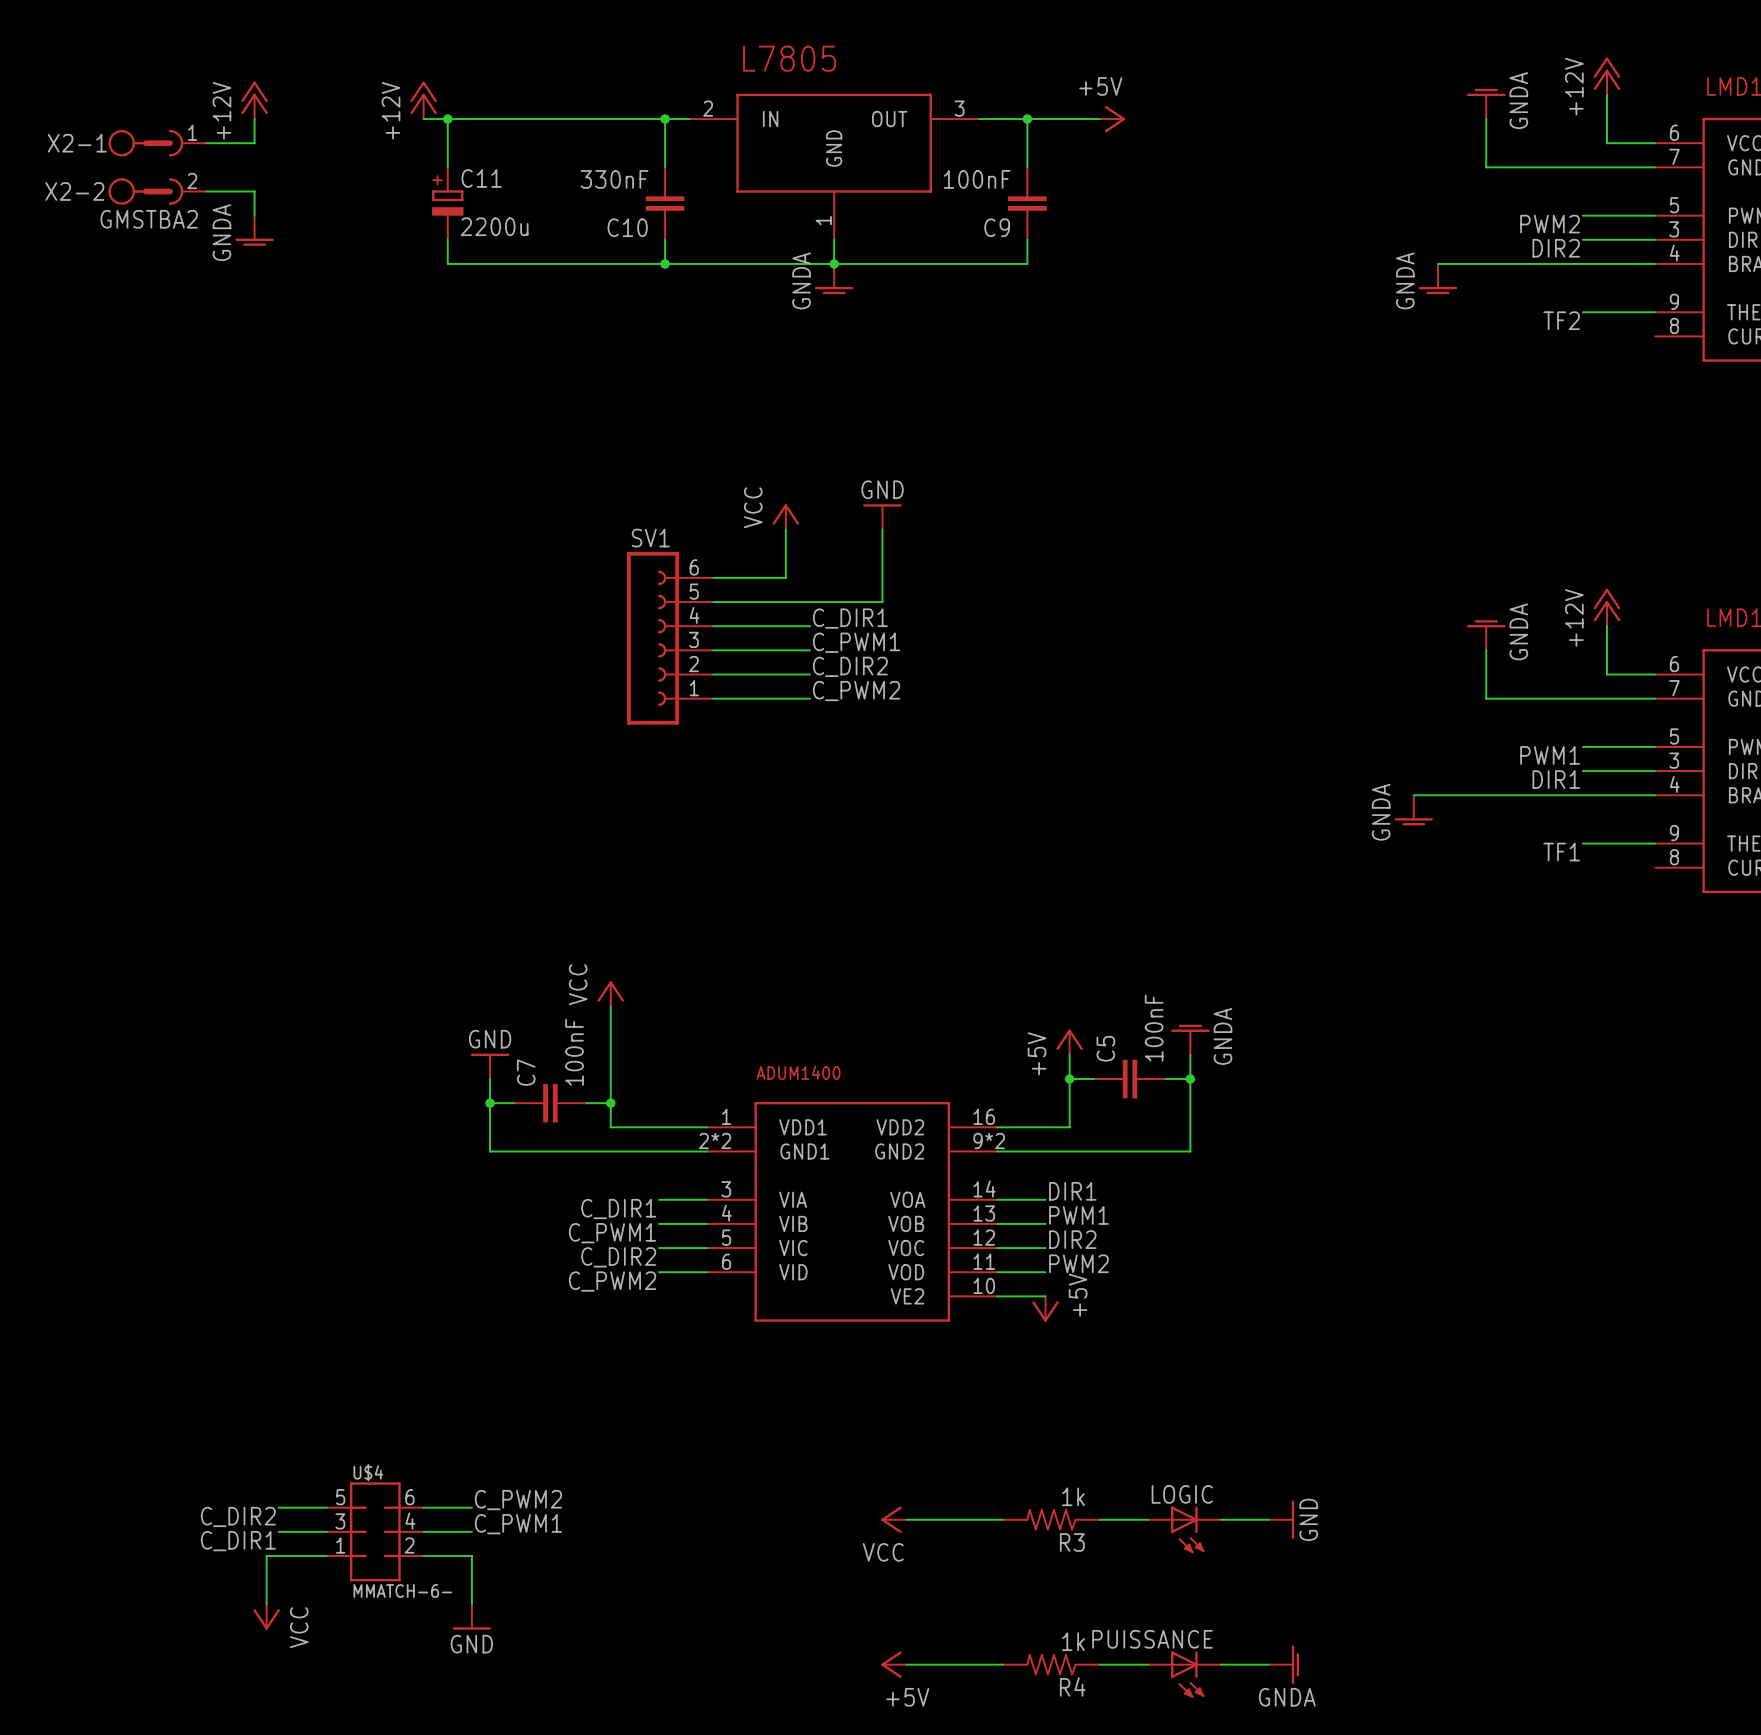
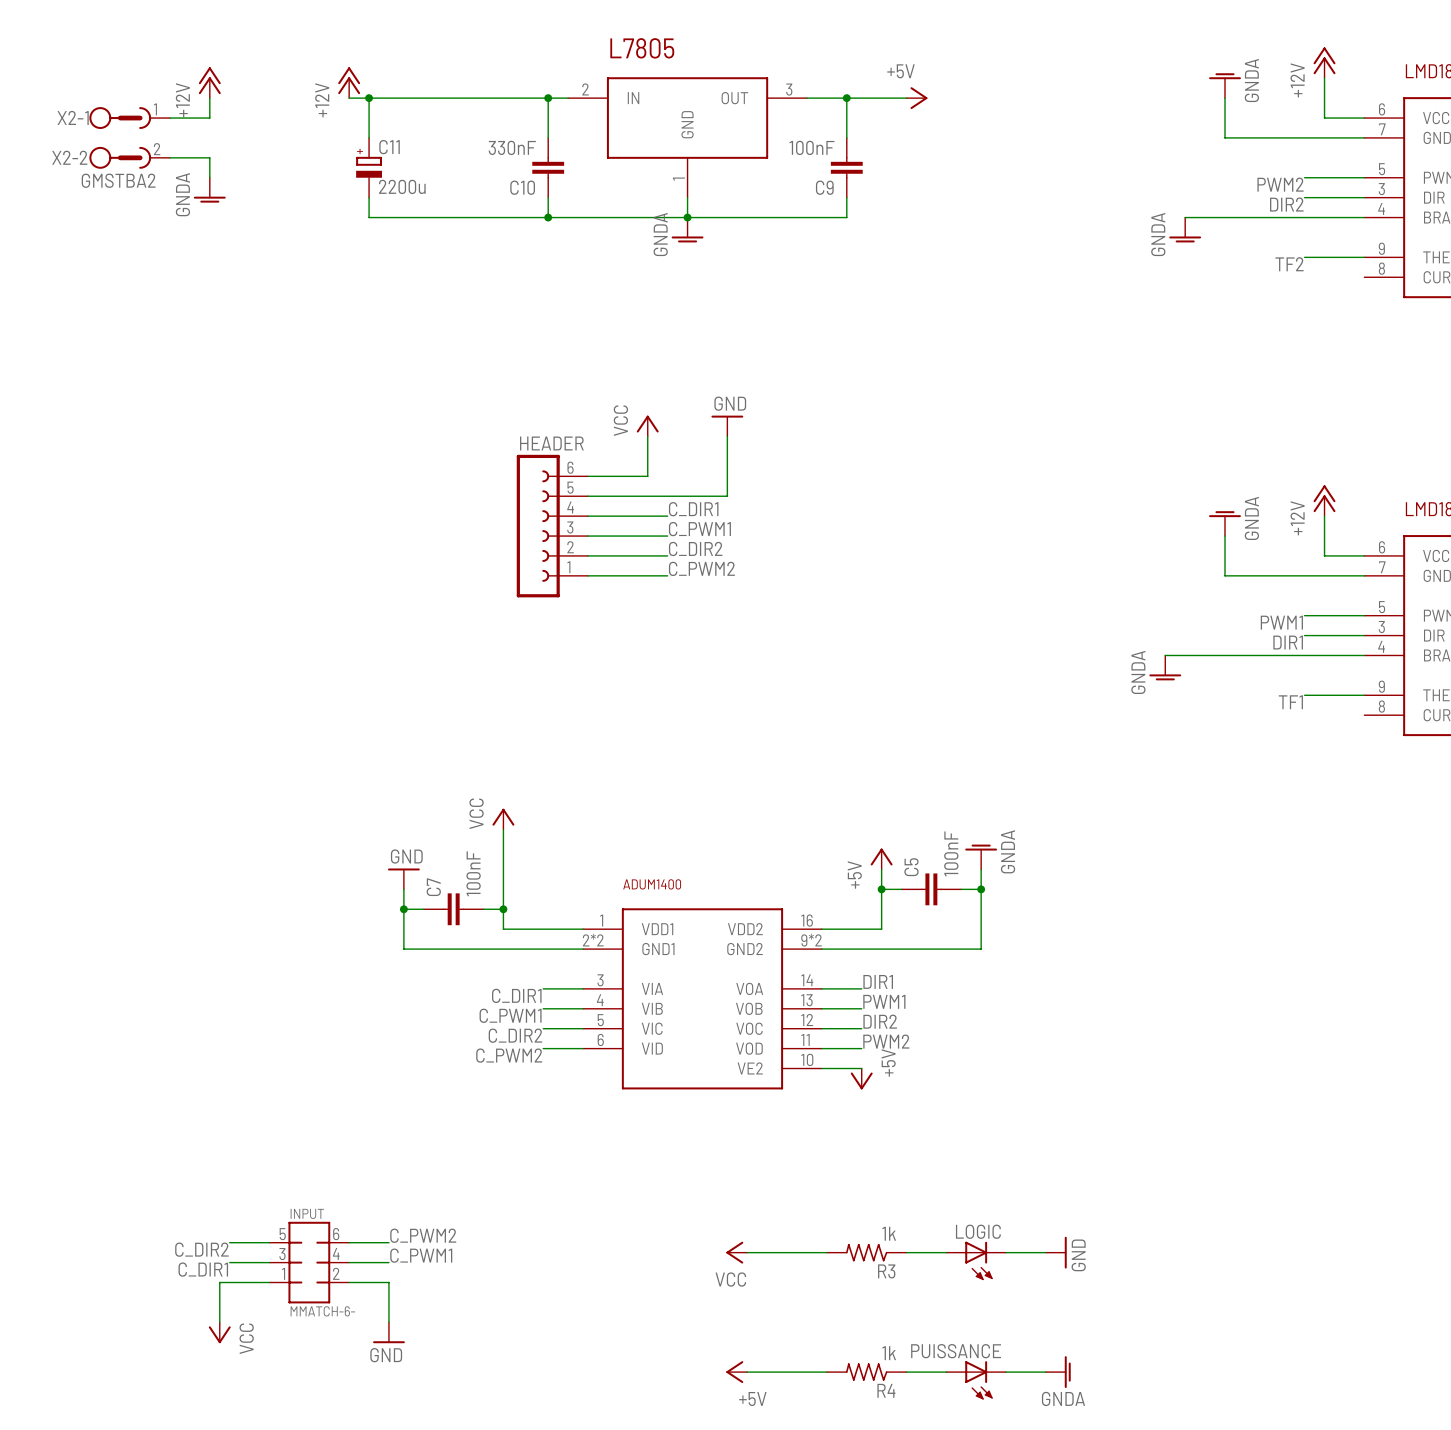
SV1 name: SV1 (650, 538) -> HEADER (551, 443)
U$4 name: U$4 (368, 1472) -> INPUT (307, 1213)

